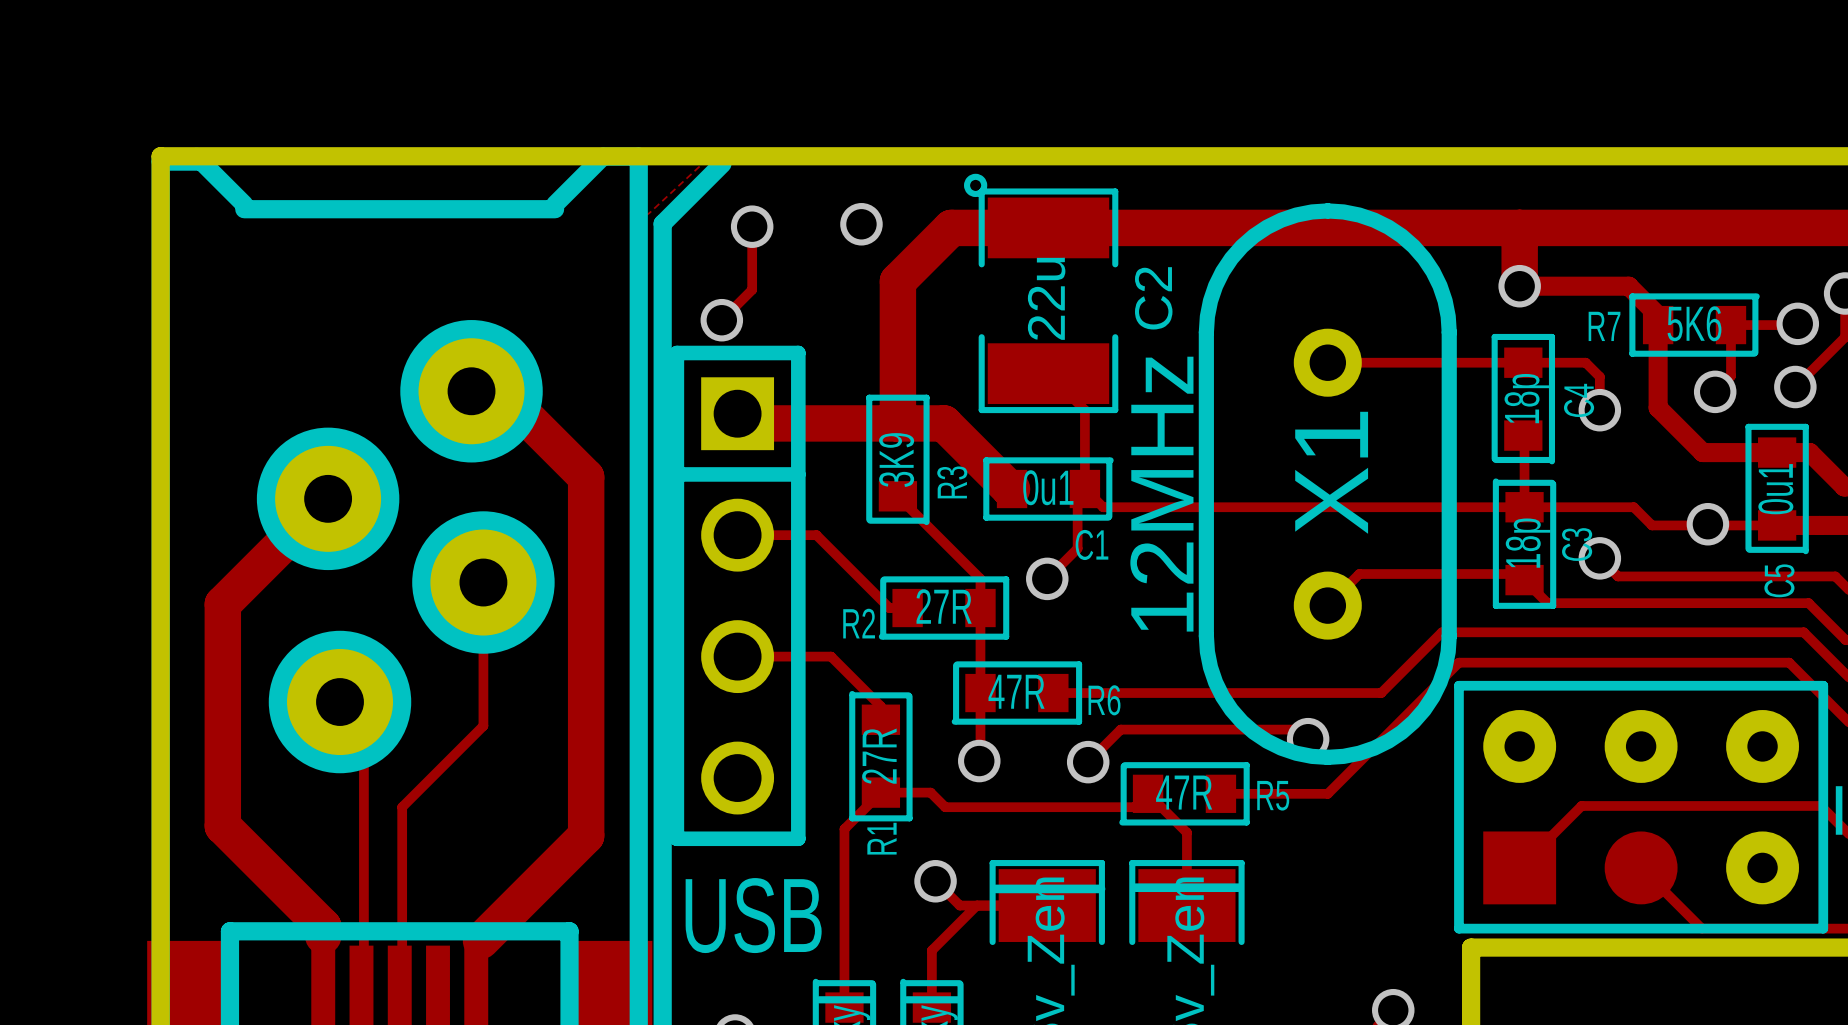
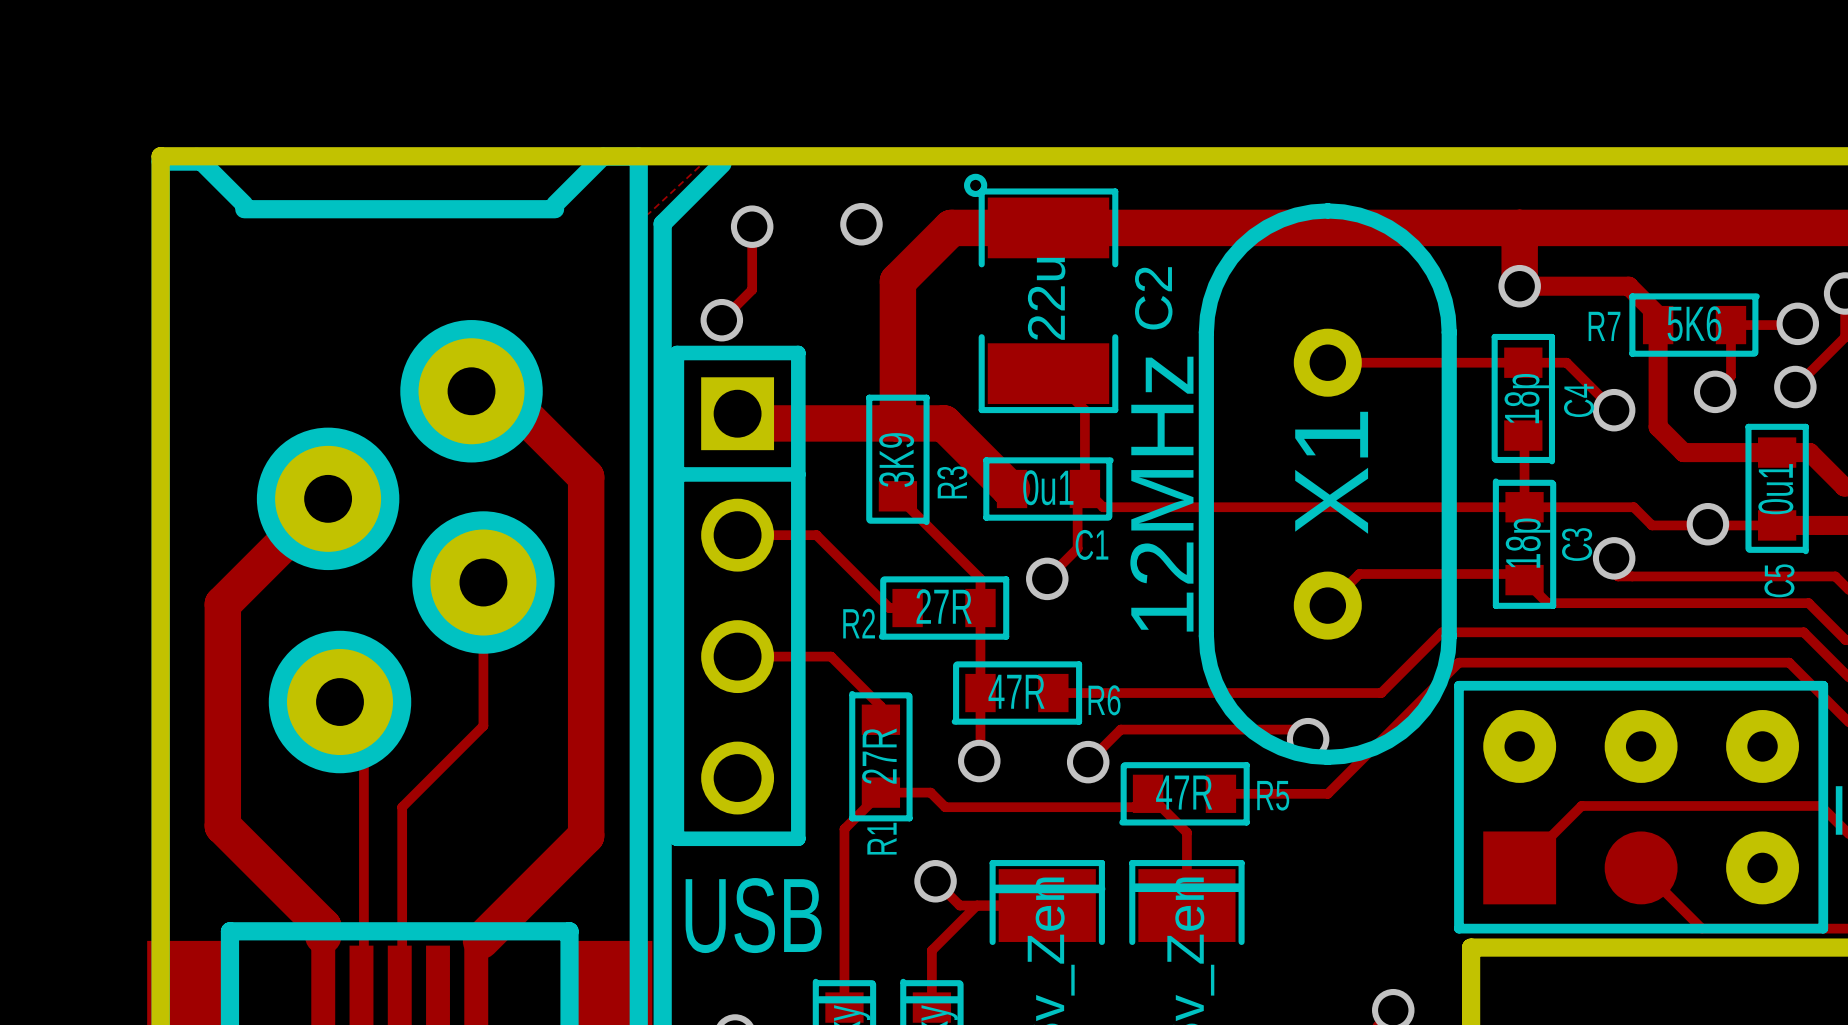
track: (1566, 362) (1585, 362) (1599, 376) (1599, 410) -> (1566, 362) (1614, 410)
track: (1658, 407) (1702, 452) -> (1658, 407) (1658, 427) (1683, 452) (1702, 452)
via position: (1599, 410) -> (1614, 410)
via position: (1599, 558) -> (1614, 558)

